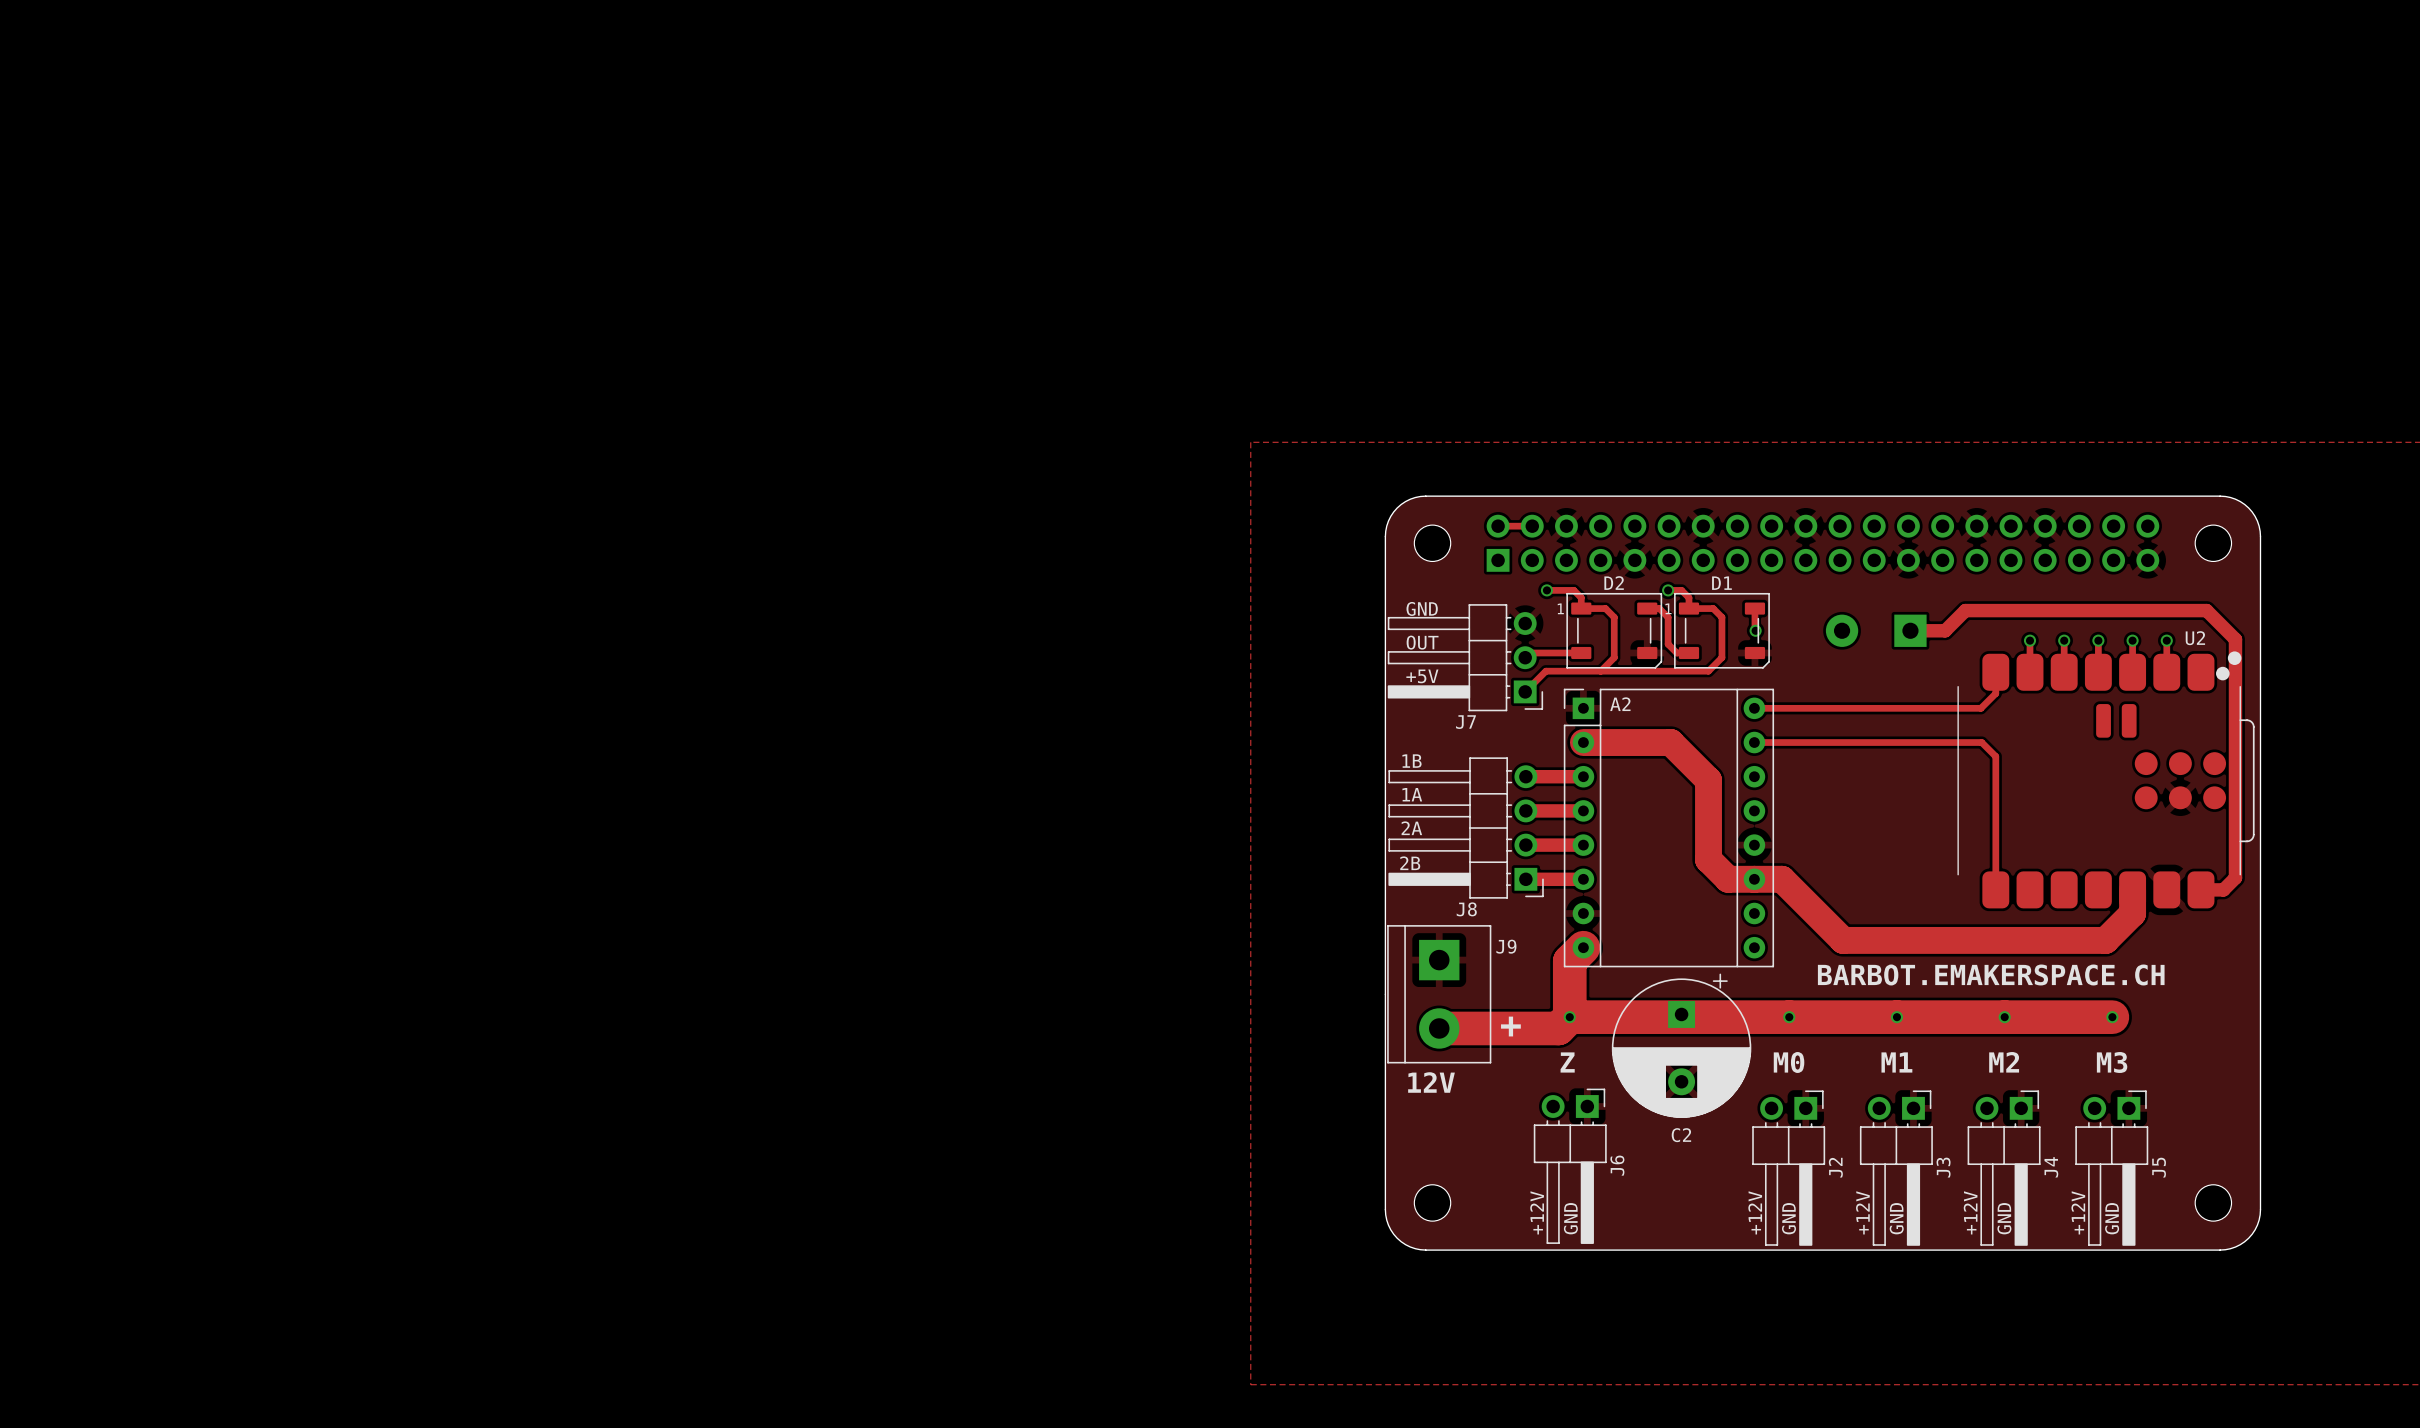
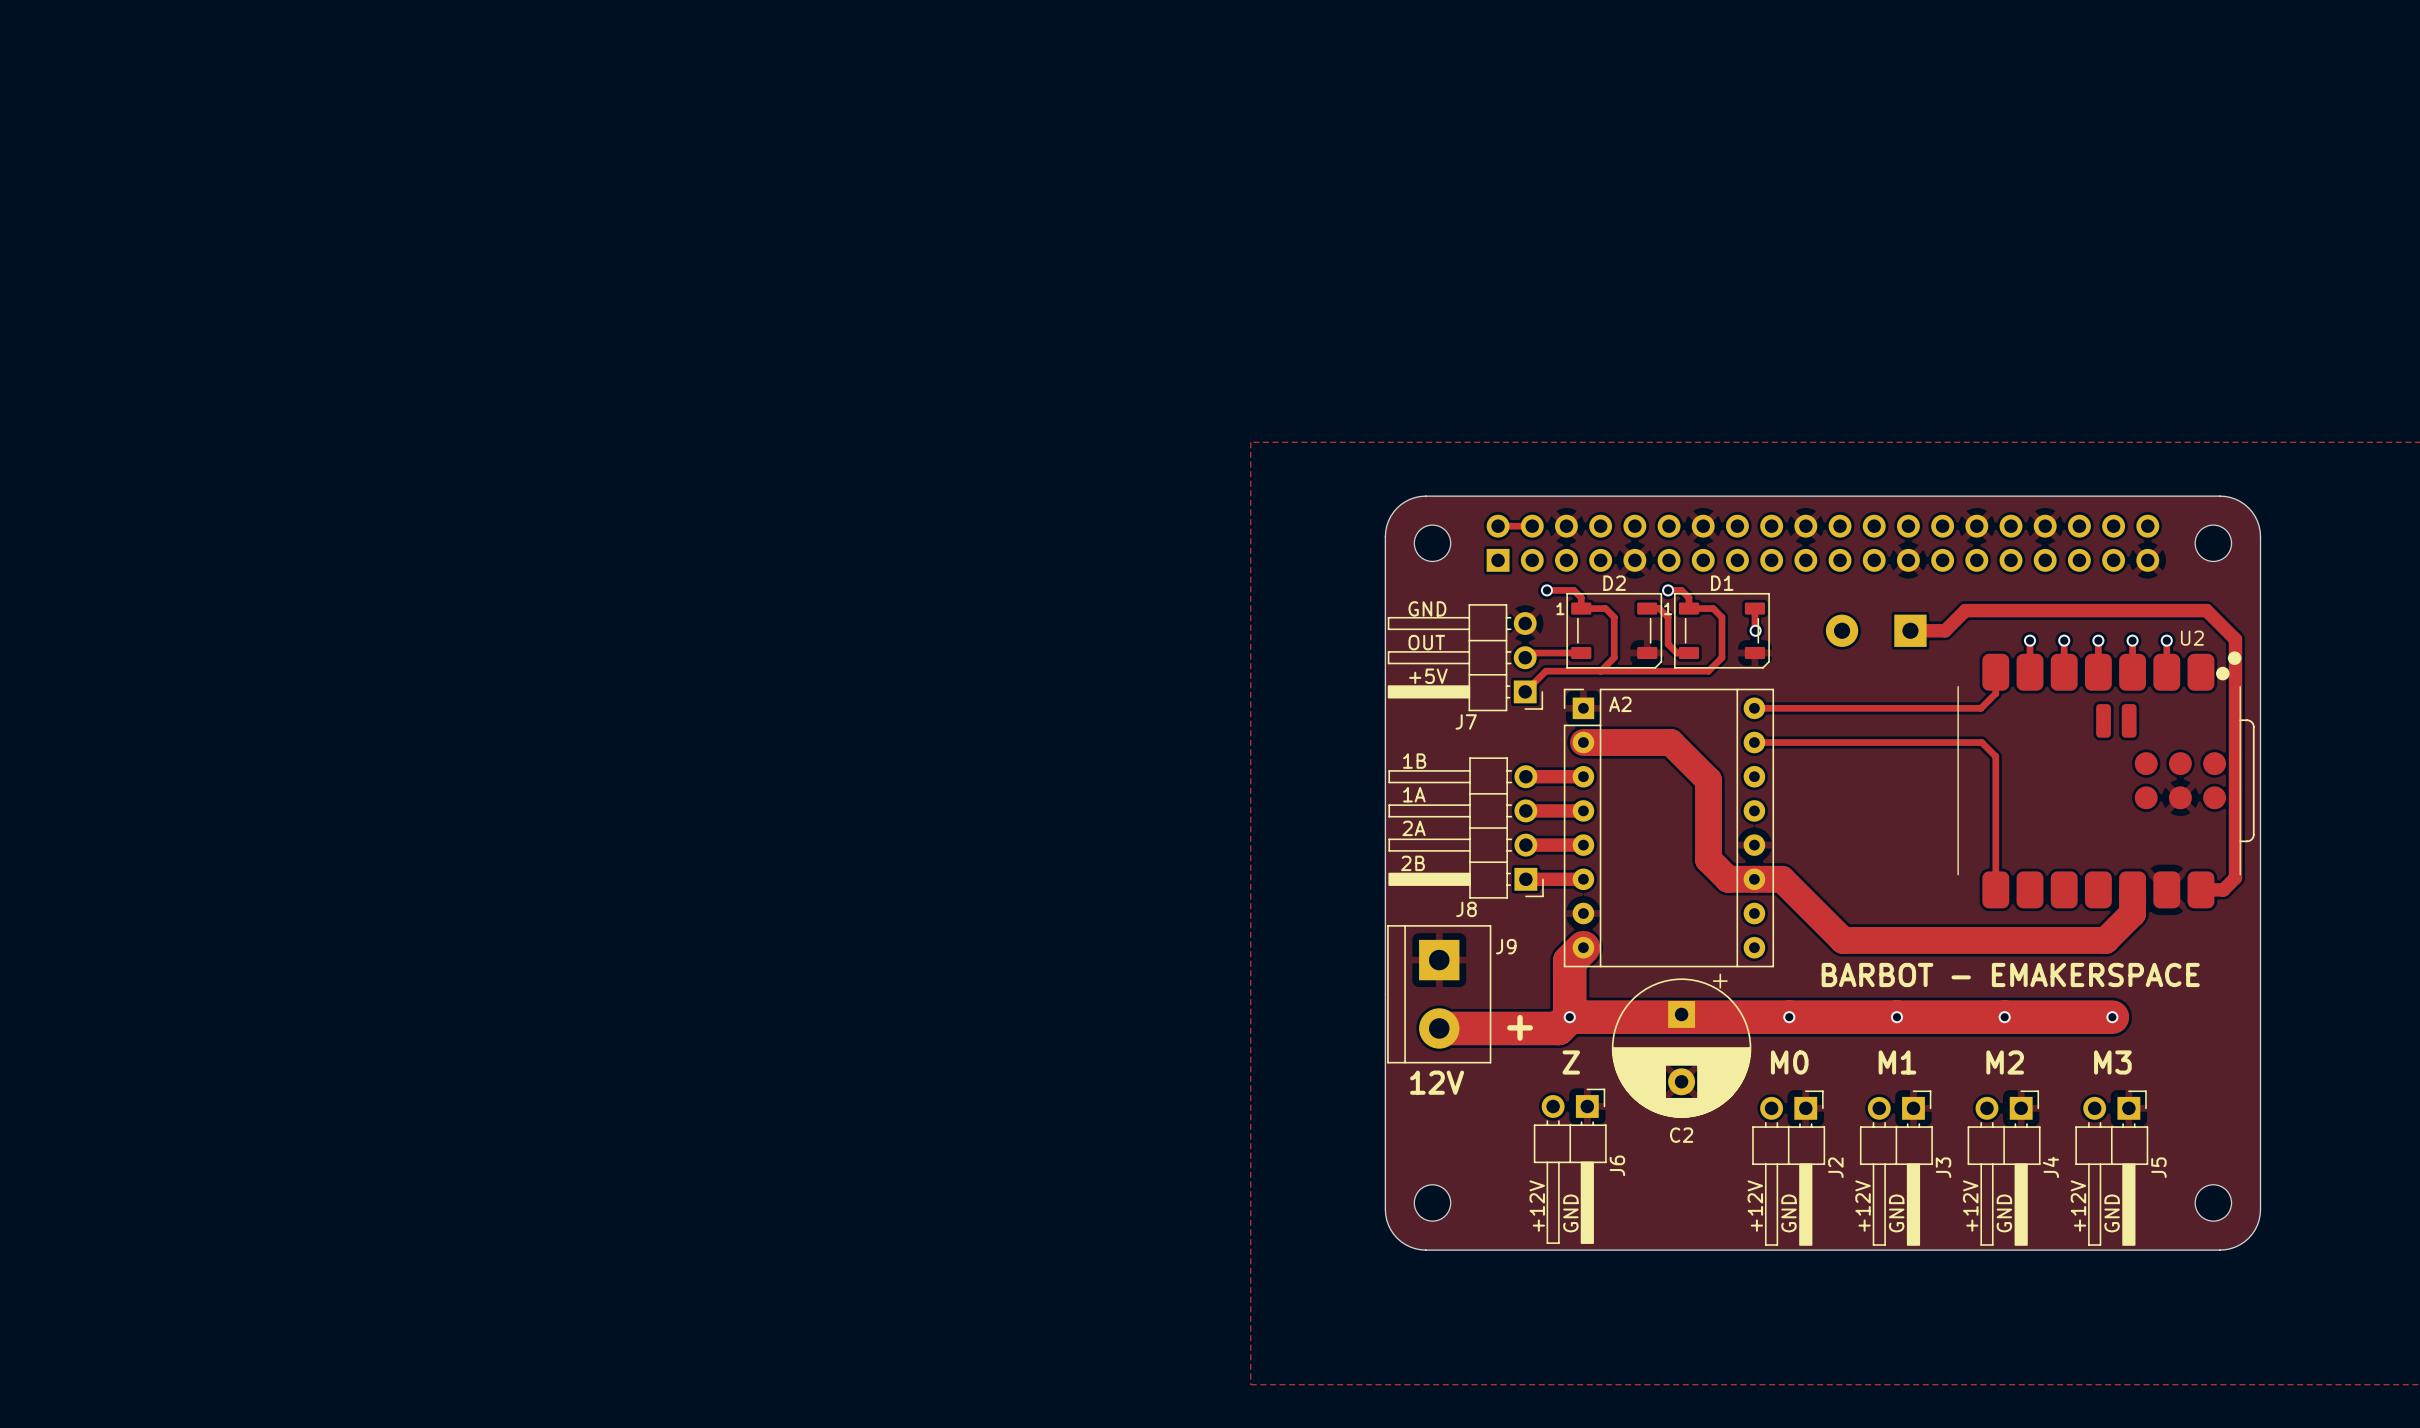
text: BARBOT.EMAKERSPACE.CH (1991, 974) -> BARBOT - EMAKERSPACE (2010, 974)

